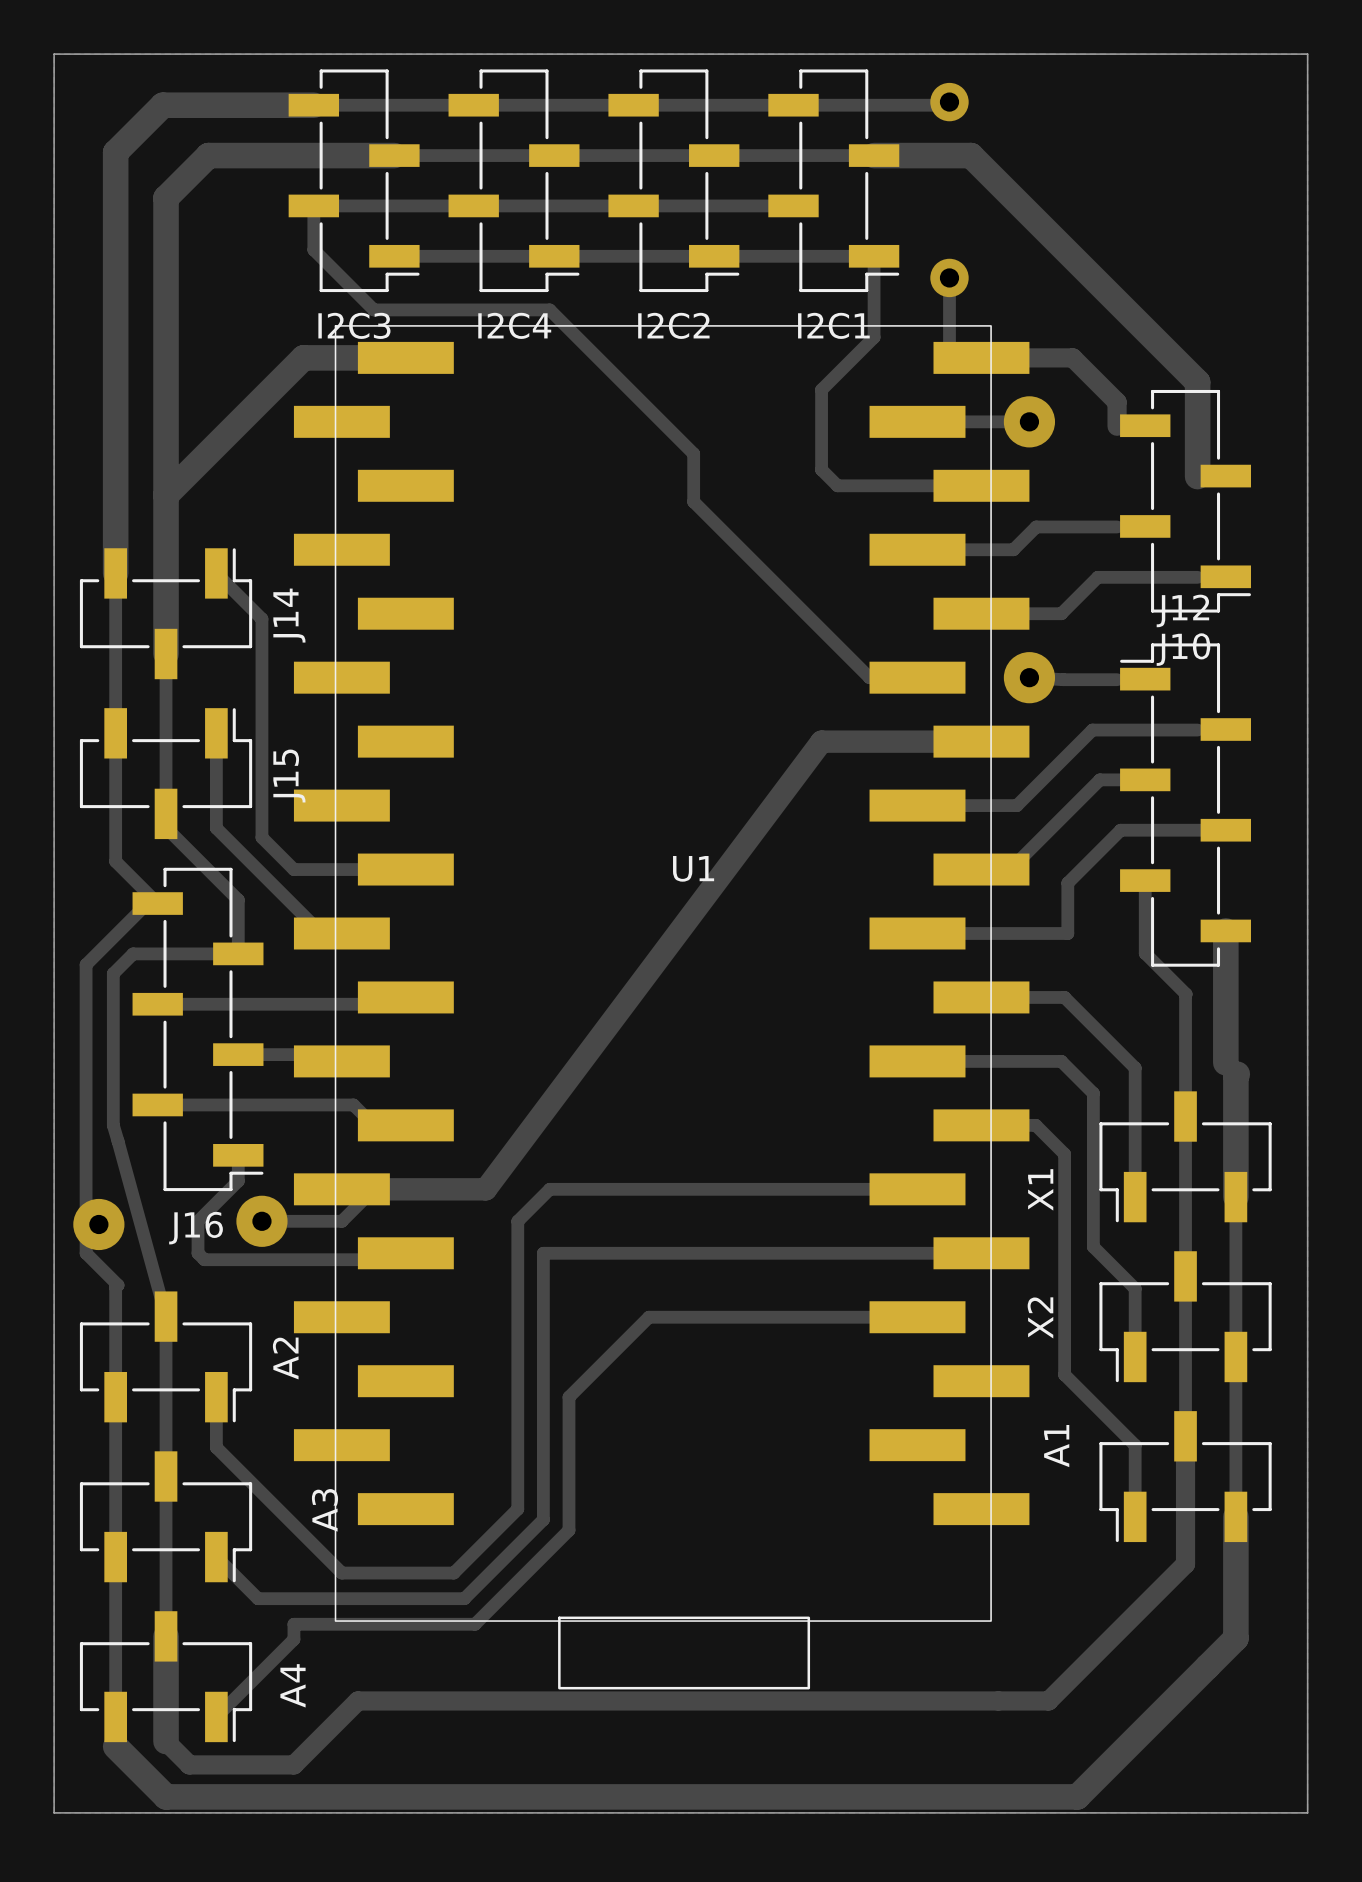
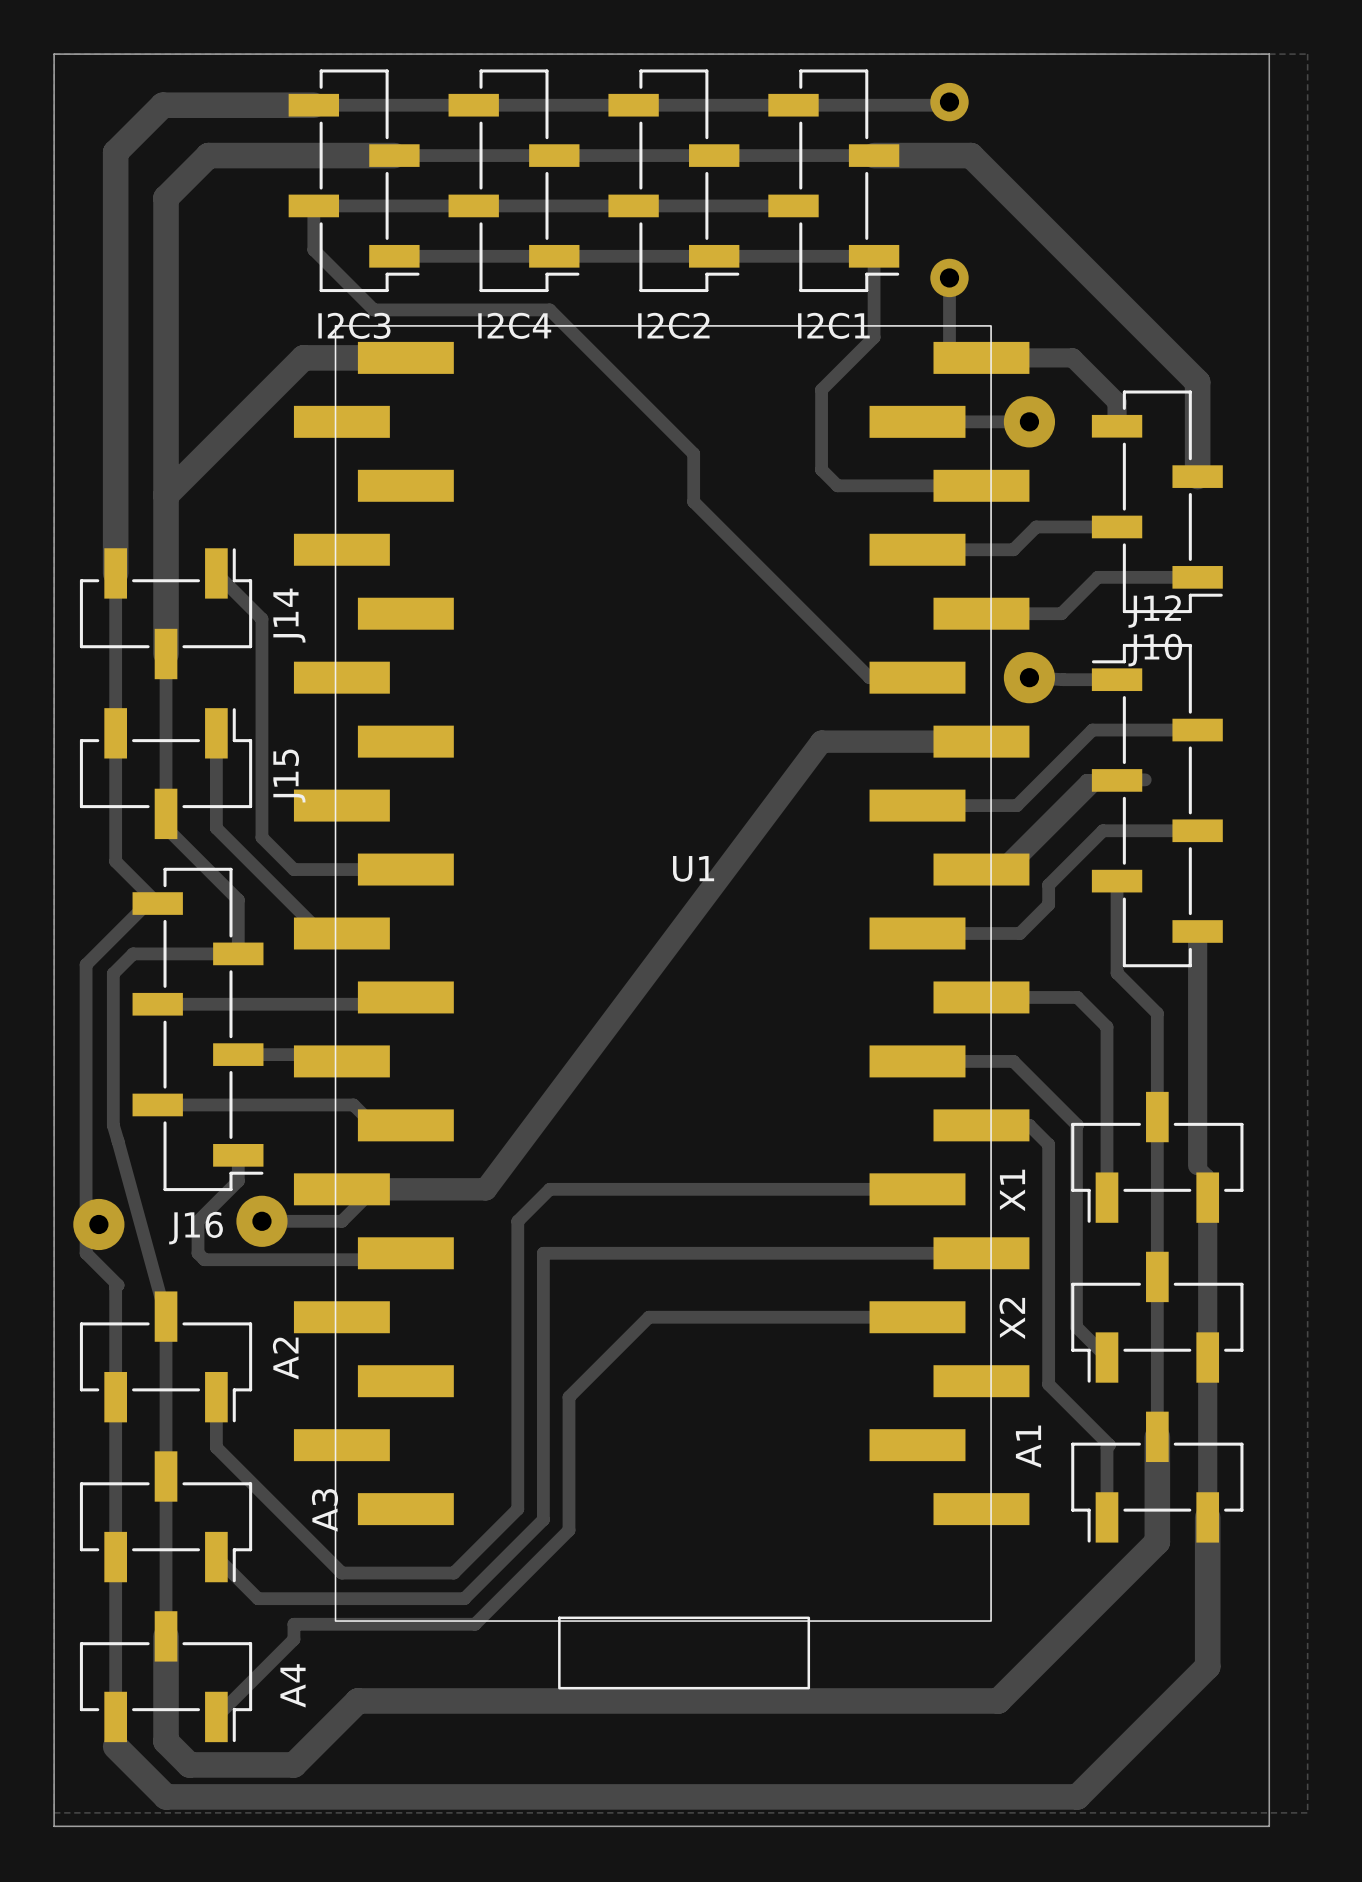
board edge: (1269, 54) (1307, 54) (1307, 1812) (54, 1812) -> (1269, 54) (1269, 1826) (54, 1826) (54, 1812)
J10 position: (1185, 501) -> (1157, 501)
track: none -> (1117, 780) (1086, 780) (997, 869)
J12 position: (1185, 805) -> (1157, 805)
track: (1225, 830) (1120, 830) (1067, 883) (1067, 933) (1019, 933) -> (1197, 830) (1102, 830) (1048, 885) (1048, 904) (1019, 933)
track: (1145, 880) (1145, 953) (1186, 994) (1185, 1564) (1048, 1700) (998, 1700) -> (1117, 881) (1117, 973) (1157, 1013) (1157, 1541) (998, 1700)
track: (1225, 930) (1225, 1062) (1237, 1074) (1235, 1638) (1207, 1666) -> (1197, 931) (1197, 1165) (1207, 1175) (1207, 1666)
track: (1064, 997) (1135, 1068) (1135, 1197) -> (1064, 997) (1077, 997) (1106, 1027) (1106, 1197)
track: (1013, 1061) (1061, 1061) (1093, 1093) (1093, 1246) (1135, 1288) (1135, 1356) -> (1013, 1061) (1077, 1125) (1076, 1326) (1106, 1357)
track: (1029, 1125) (1035, 1125) (1064, 1154) (1064, 1374) (1135, 1445) (1135, 1516) -> (1029, 1125) (1048, 1144) (1048, 1384) (1109, 1445) (1106, 1447) (1106, 1517)
X1 position: (1185, 1156) -> (1157, 1157)
X2 position: (1185, 1316) -> (1157, 1317)
A1 position: (1185, 1476) -> (1157, 1477)
track width: thin (998, 1700) (357, 1700) (293, 1764) (189, 1764) (166, 1741) -> thick (998, 1700) (357, 1700) (293, 1764) (189, 1764) (166, 1741)

